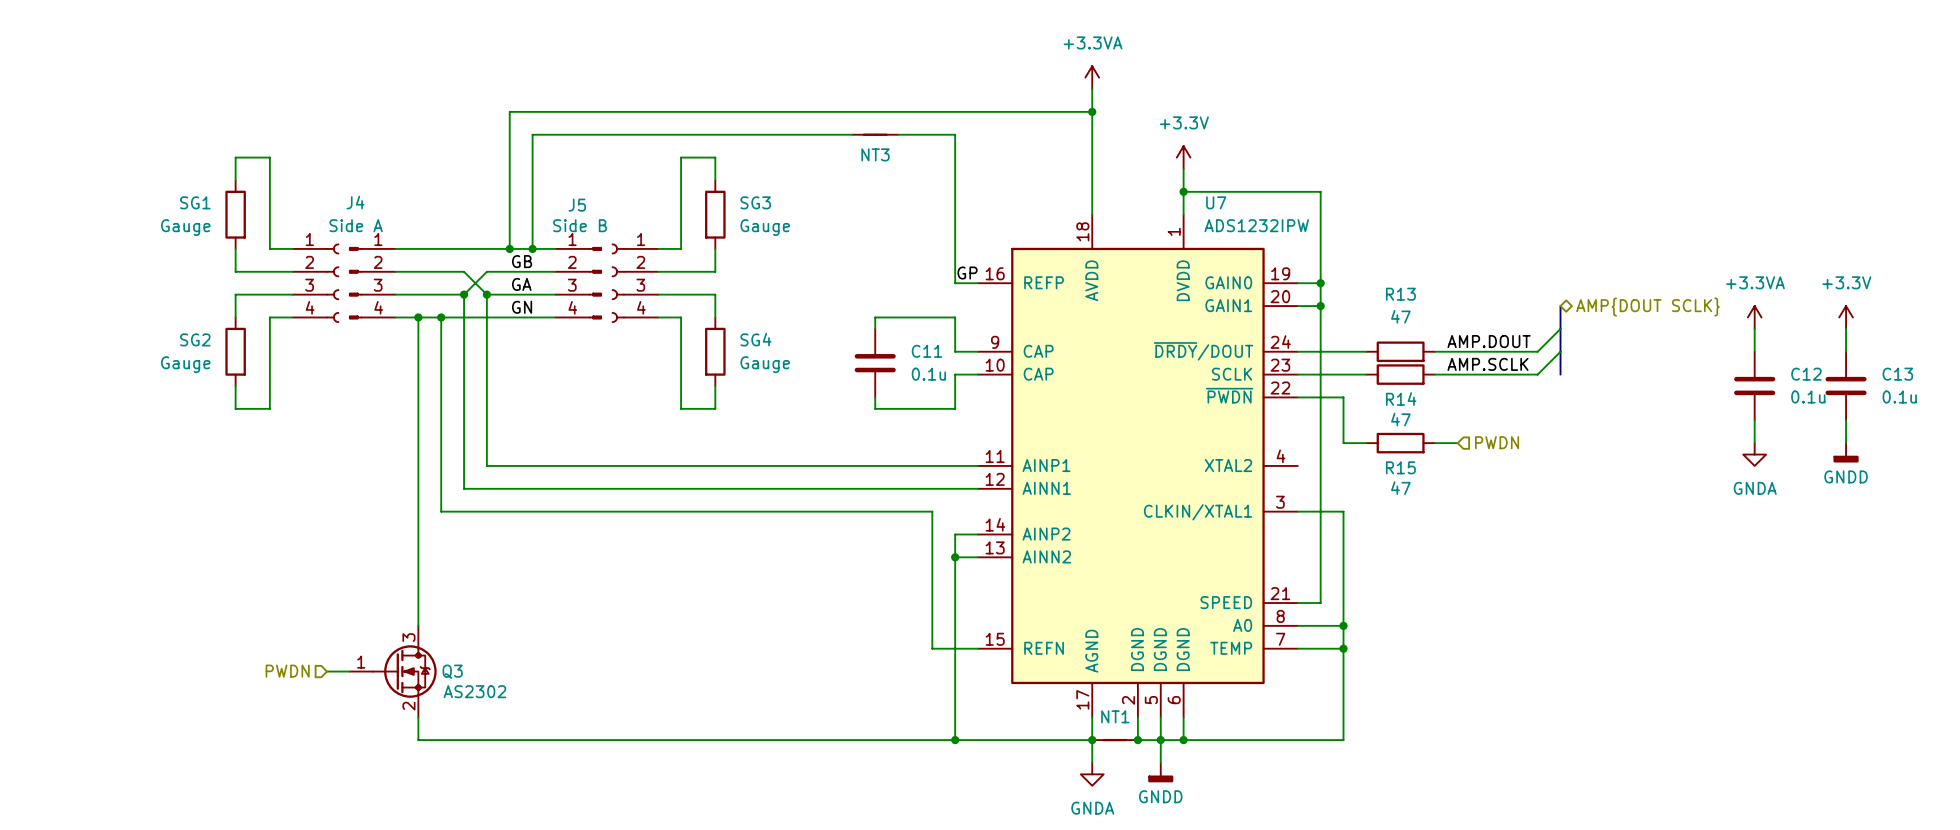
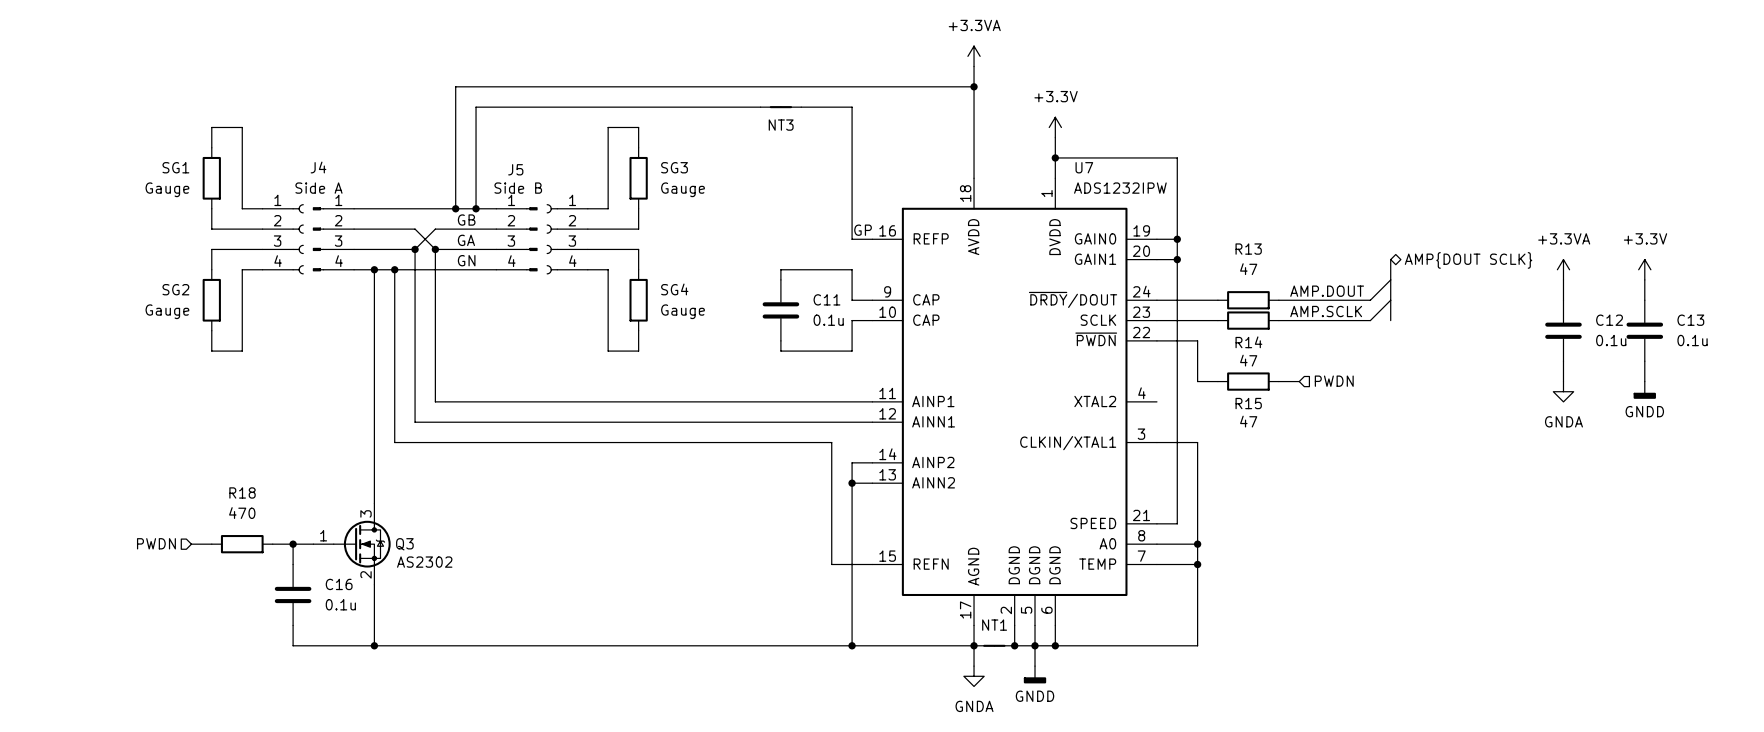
R18: none -> 470 (242, 544)
wire: none -> (272, 544) (313, 544)
wire: none -> (293, 544) (293, 564)
junction: none -> (293, 544)
hierarchical label position: PWDN (287, 671) -> PWDN (156, 543)
wire: (326, 671) (349, 671) -> (191, 544) (211, 544)
Q3 position: (393, 671) -> (352, 544)
C16: none -> 0.1u (293, 594)
wire: none -> (293, 625) (293, 645) (374, 645)
junction: none -> (374, 645)

